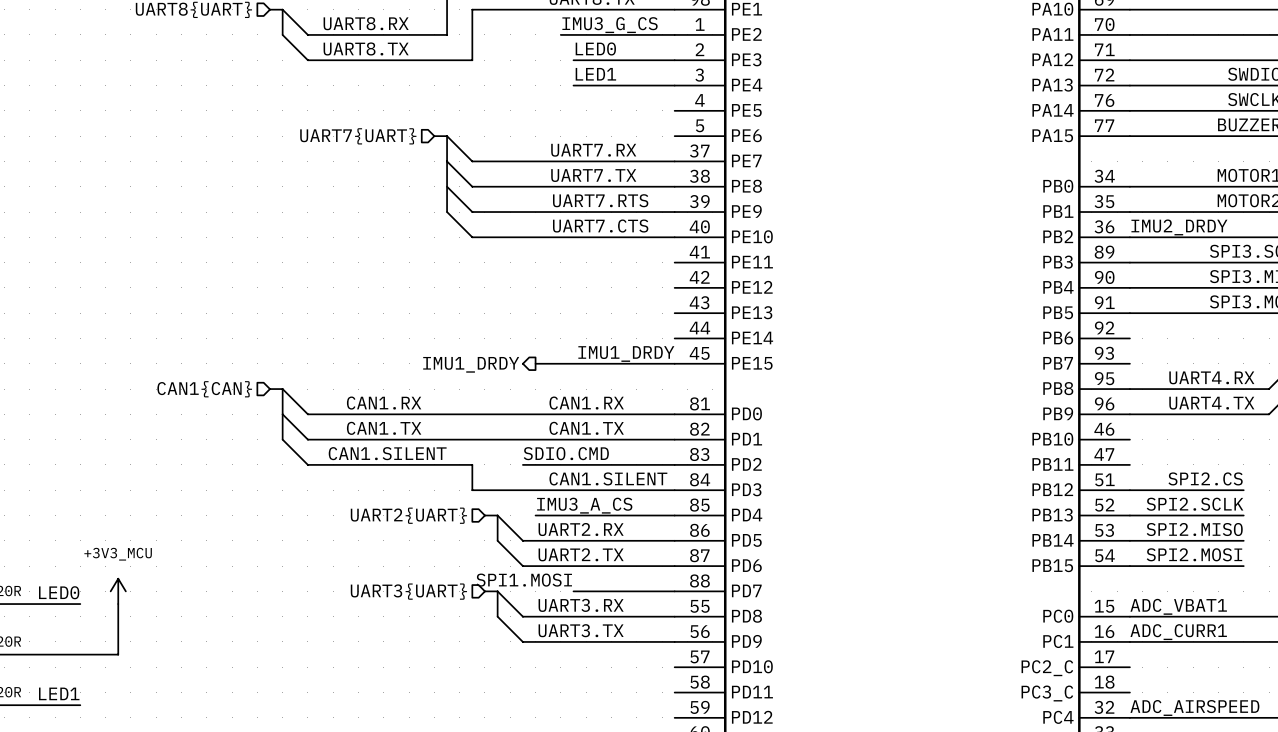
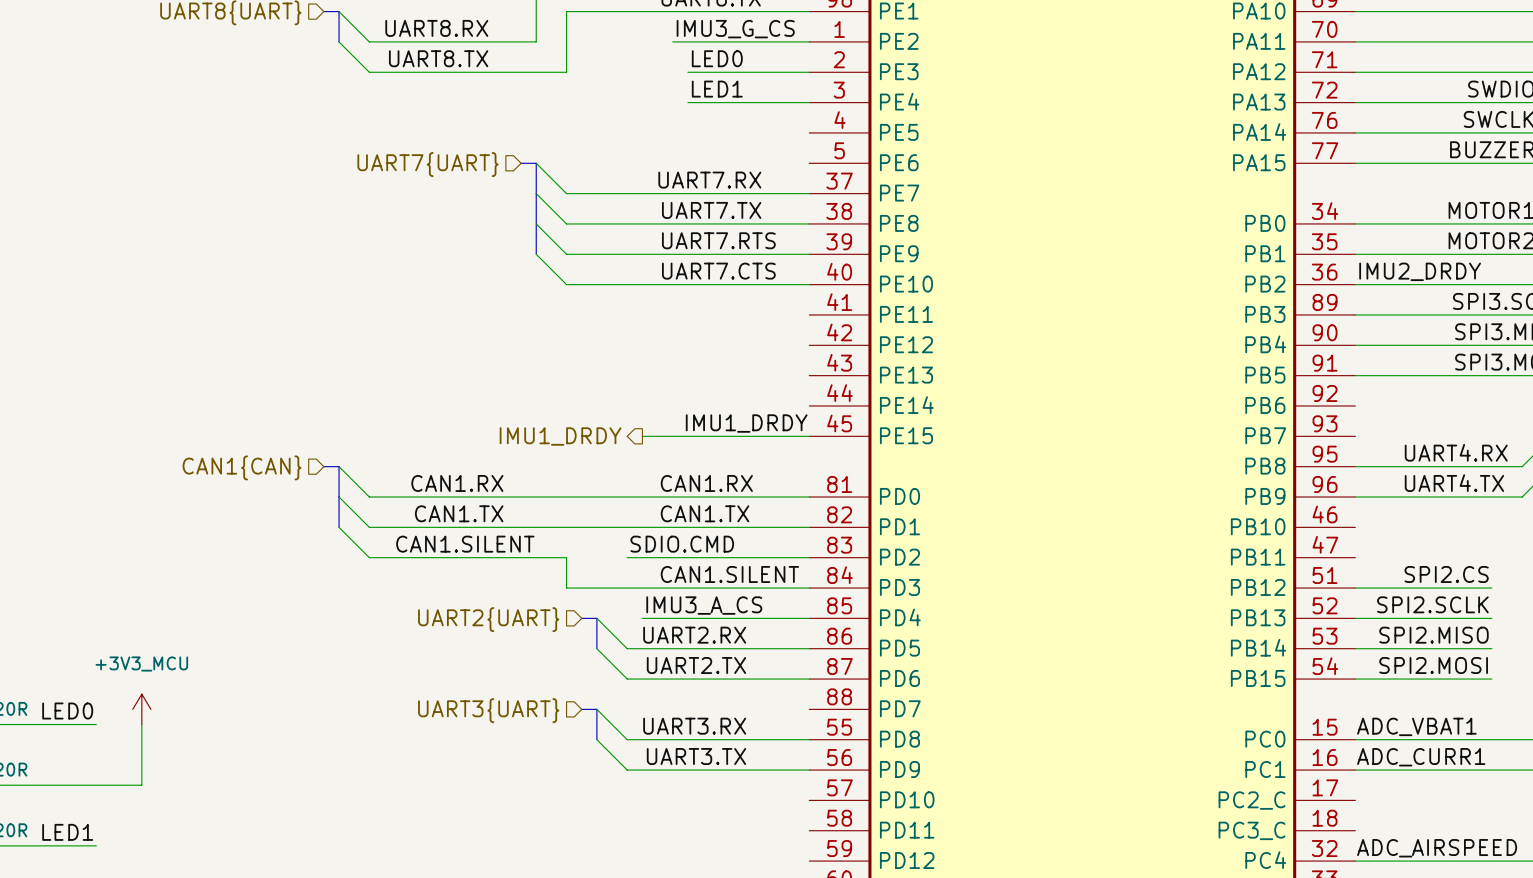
label: SPI1.MOSI (524, 580) -> none
wire: (573, 591) (674, 591) -> none

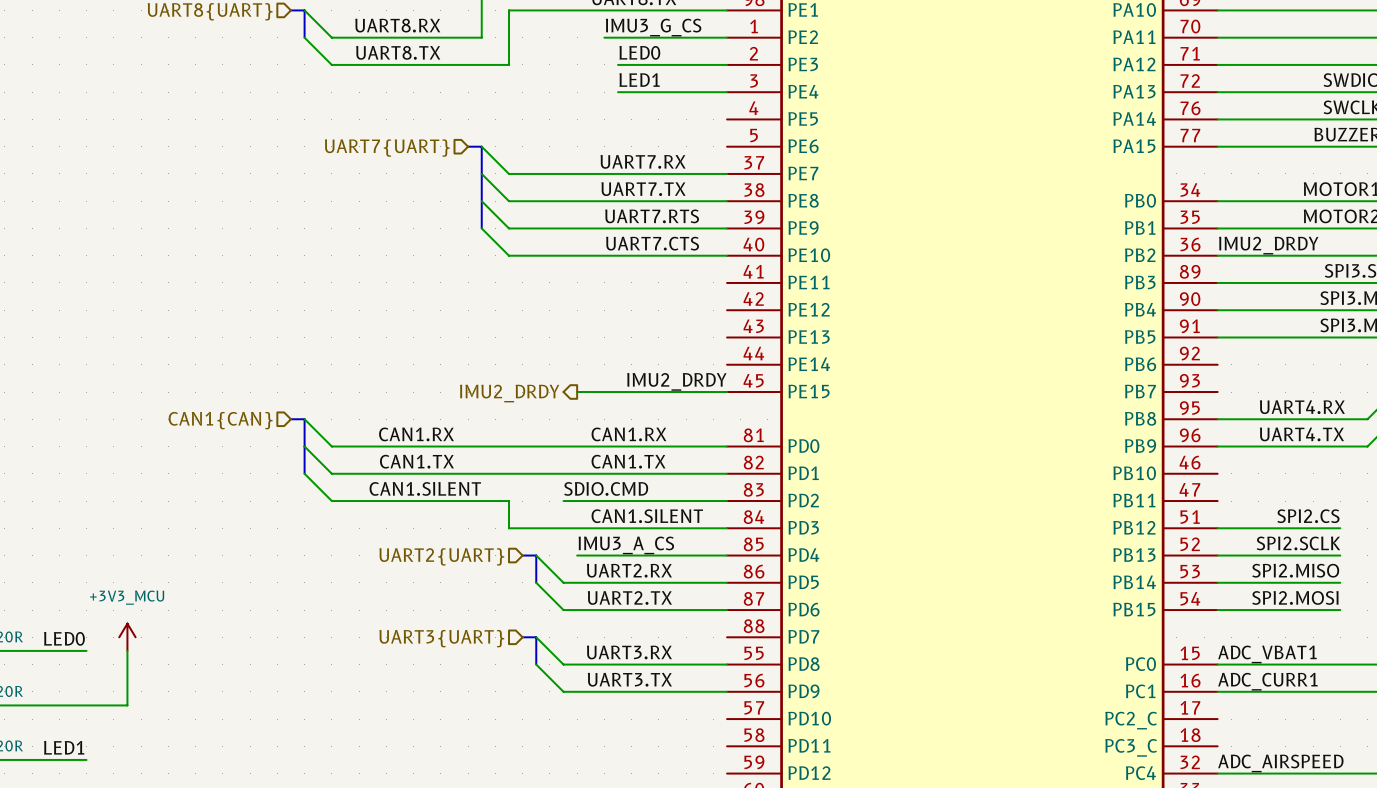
label: IMU1_DRDY (746, 423) -> IMU2_DRDY (676, 381)
hierarchical label: IMU1_DRDY (560, 436) -> IMU2_DRDY (509, 393)

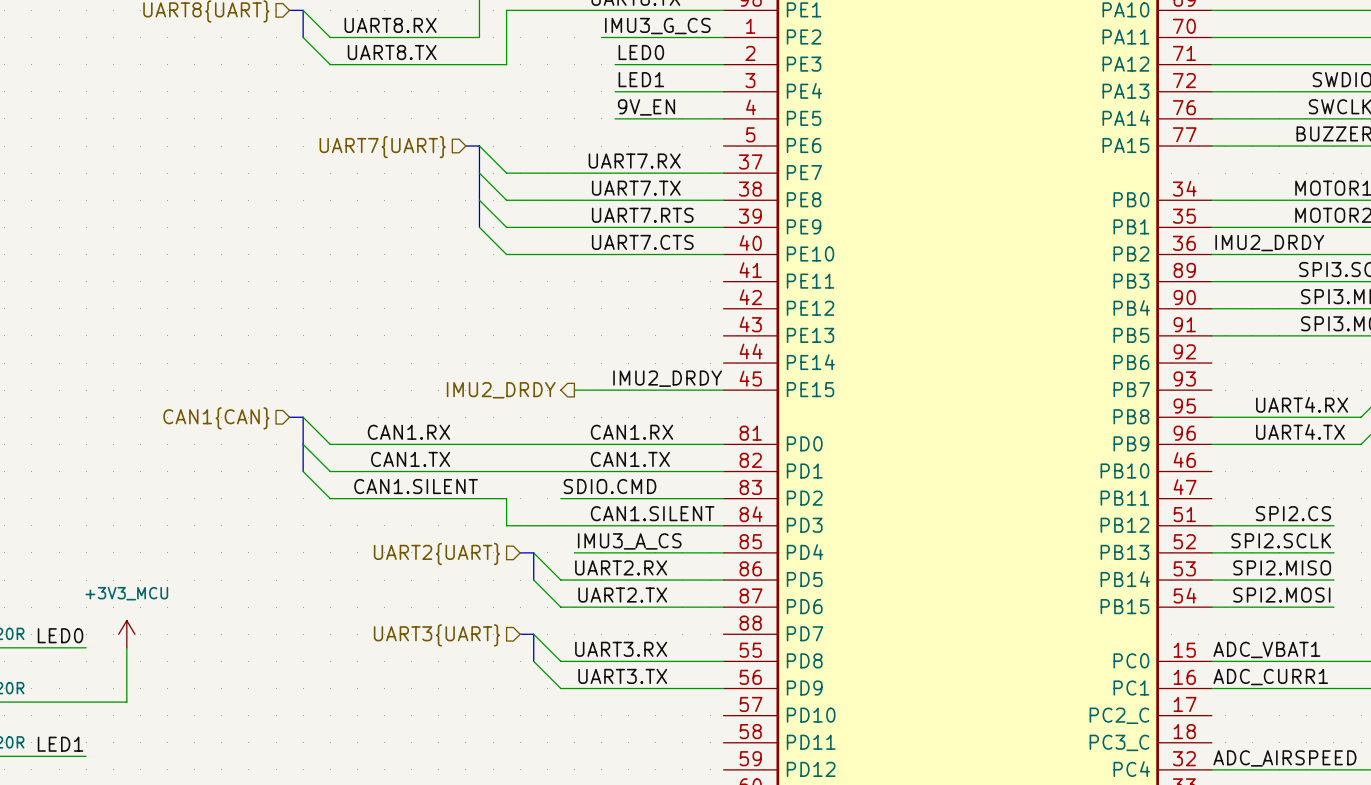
label: none -> 9V_EN (646, 107)
wire: none -> (615, 118) (723, 118)

